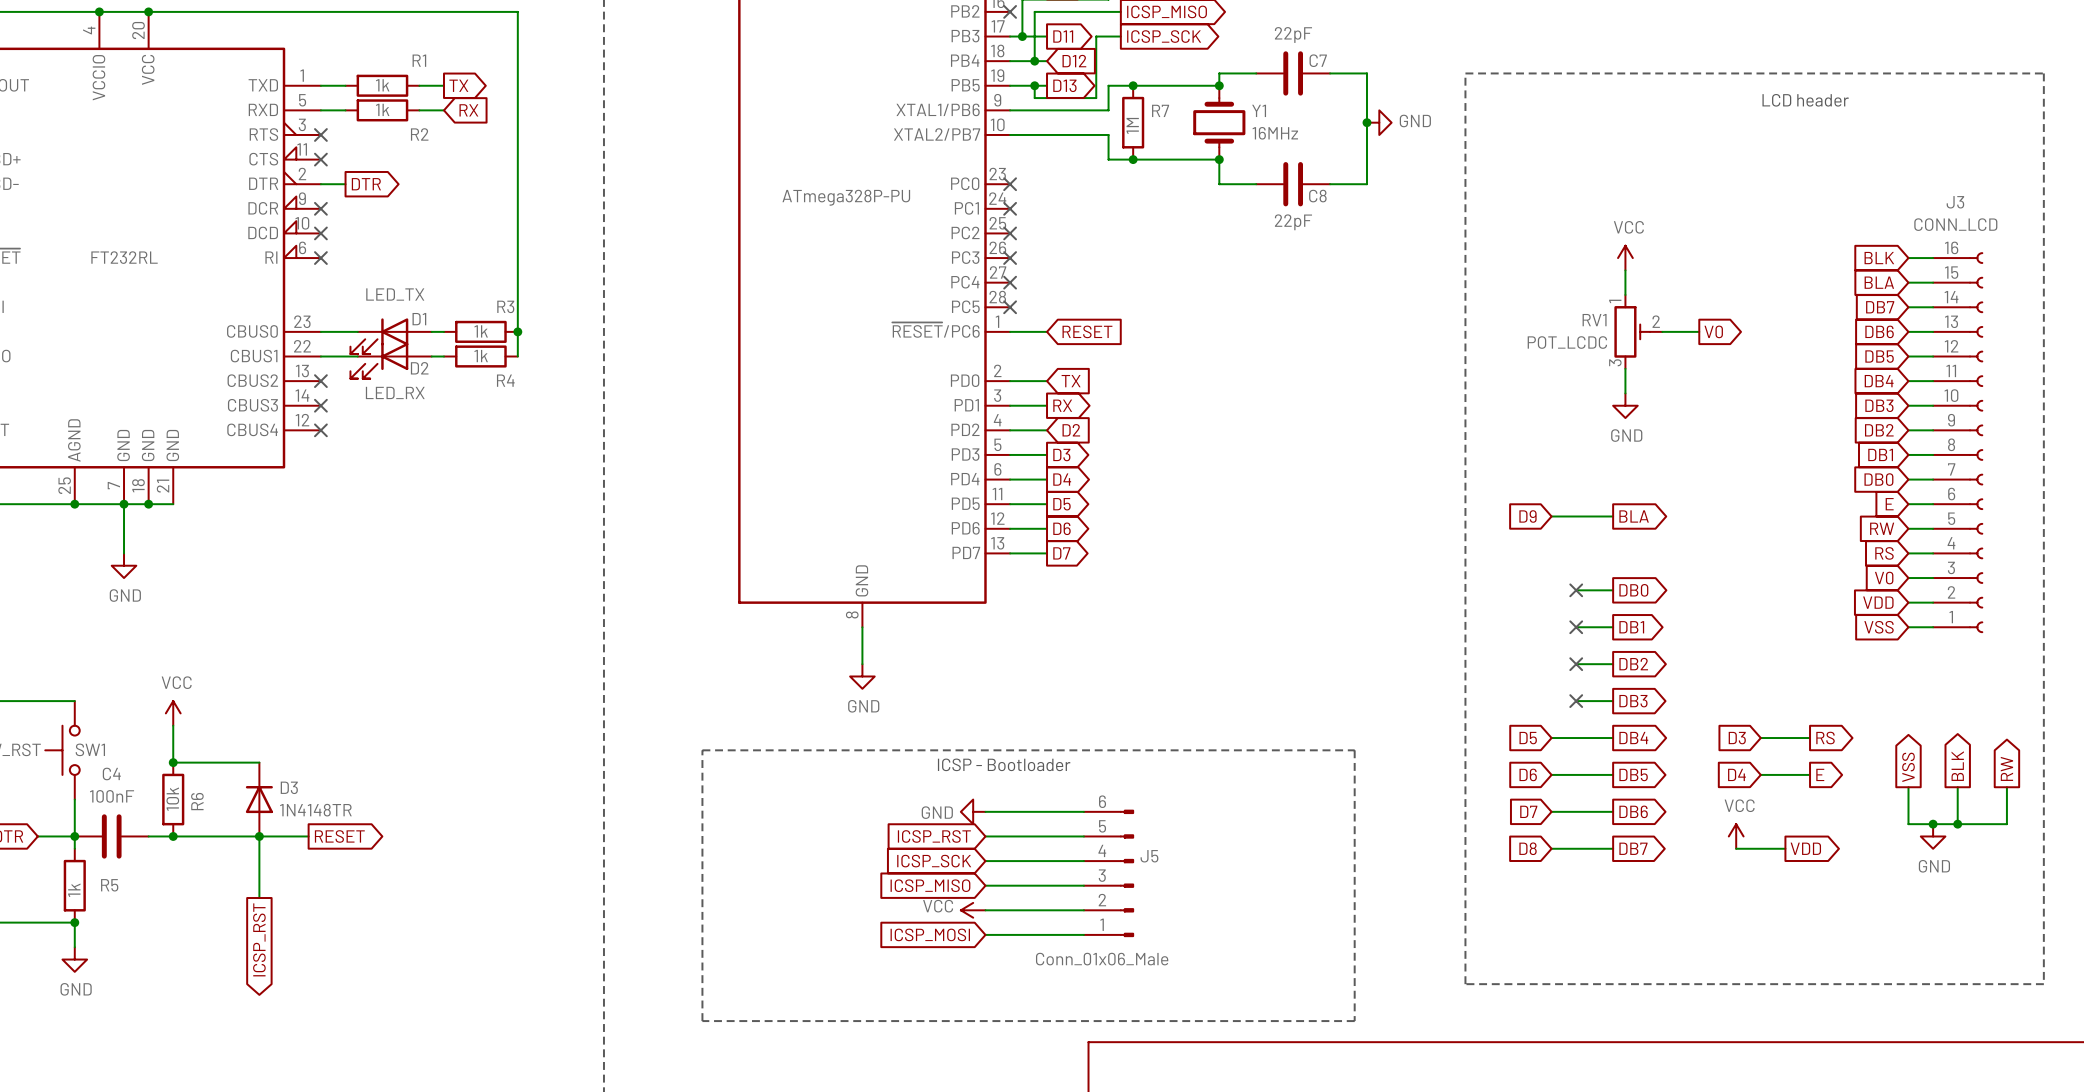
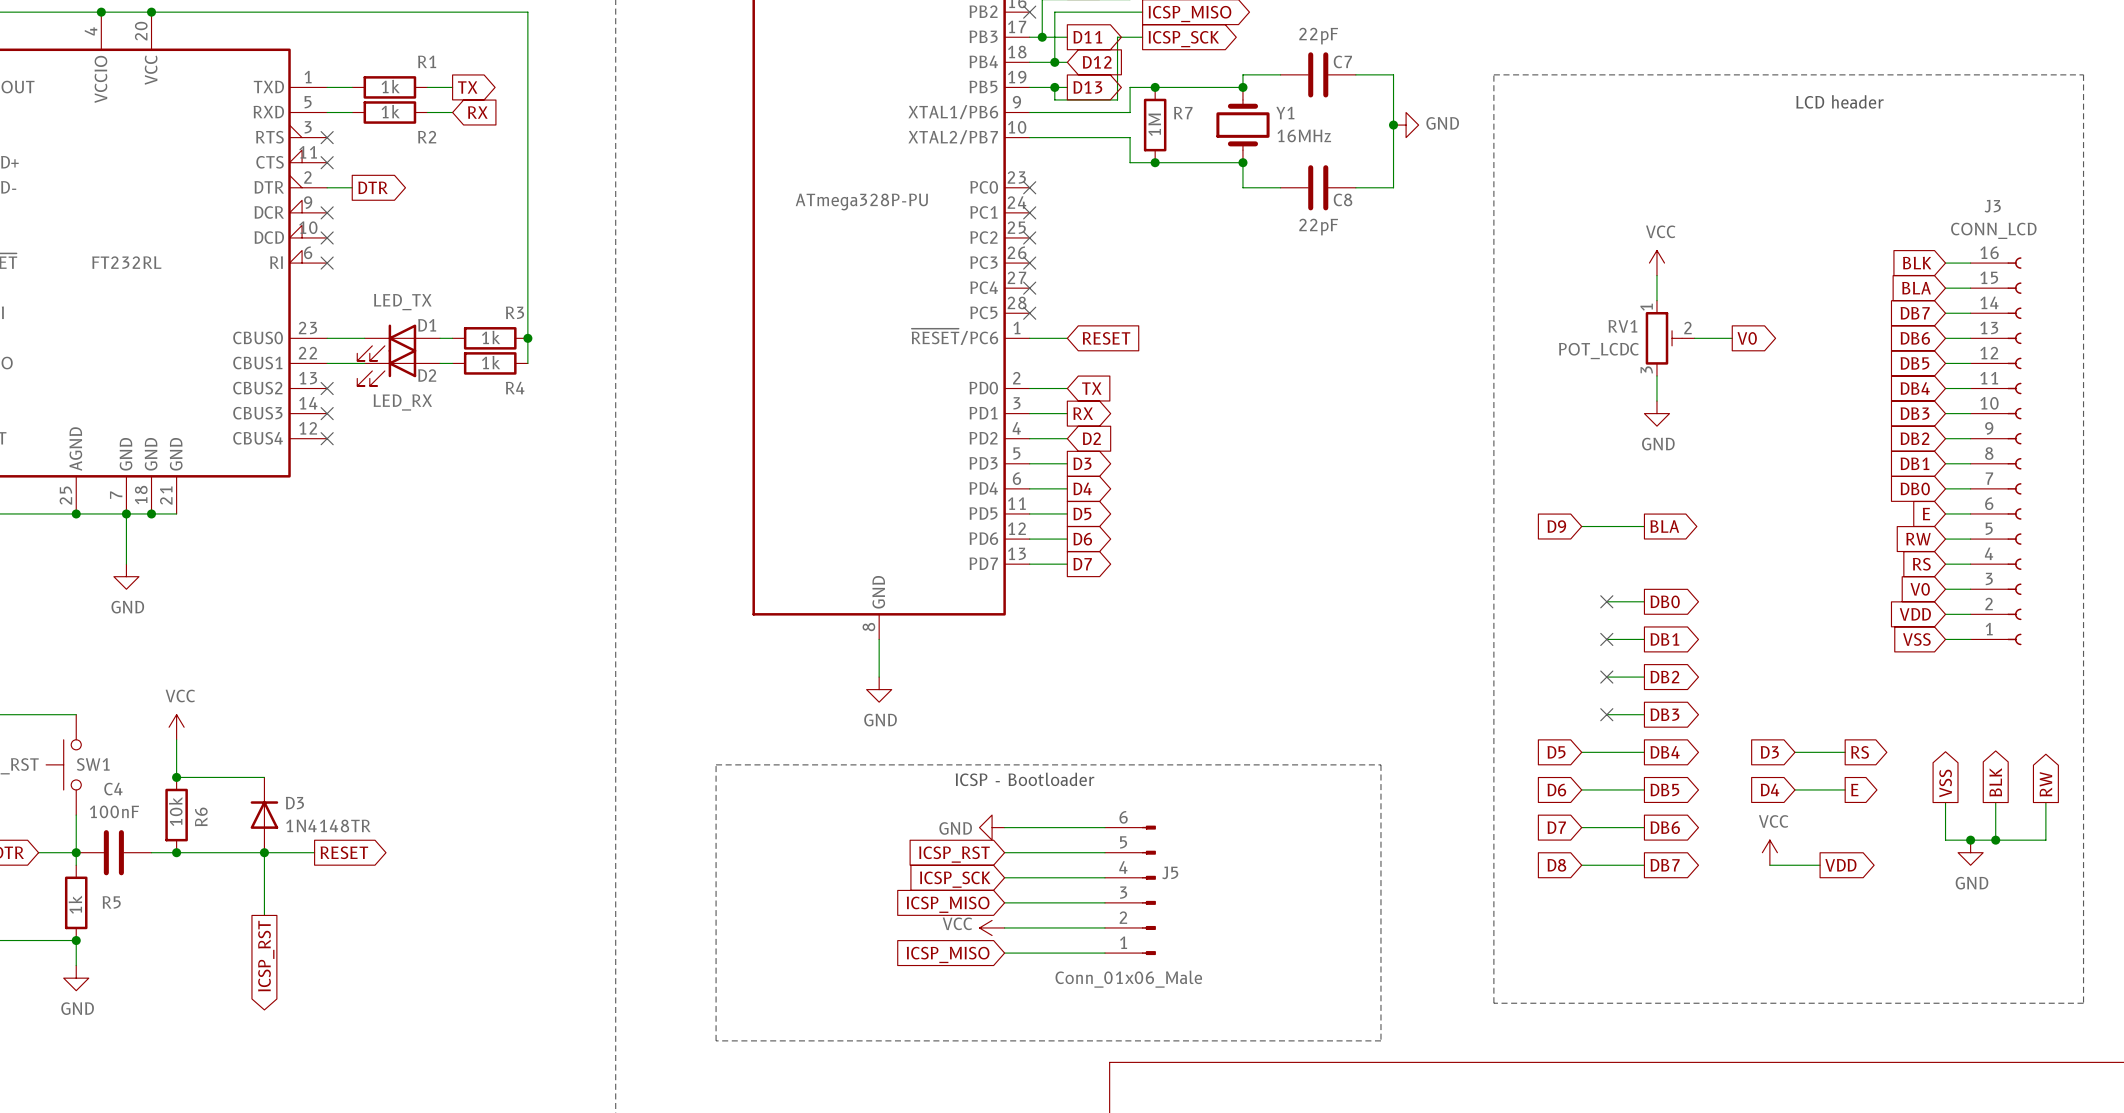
global label: ICSP_MOSI (930, 934) -> ICSP_MISO (948, 954)

